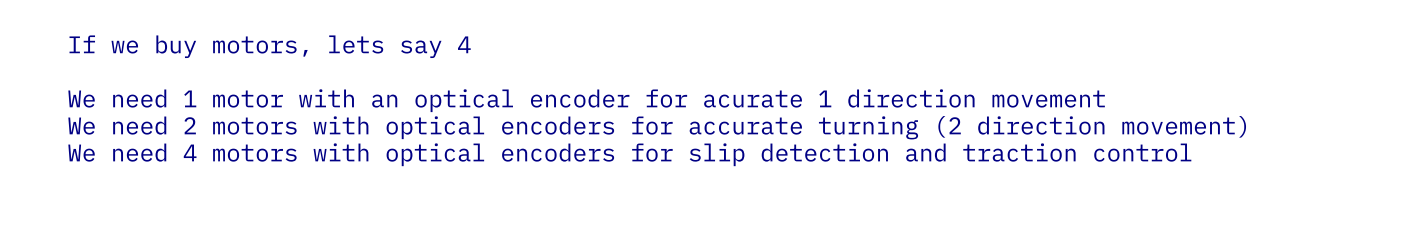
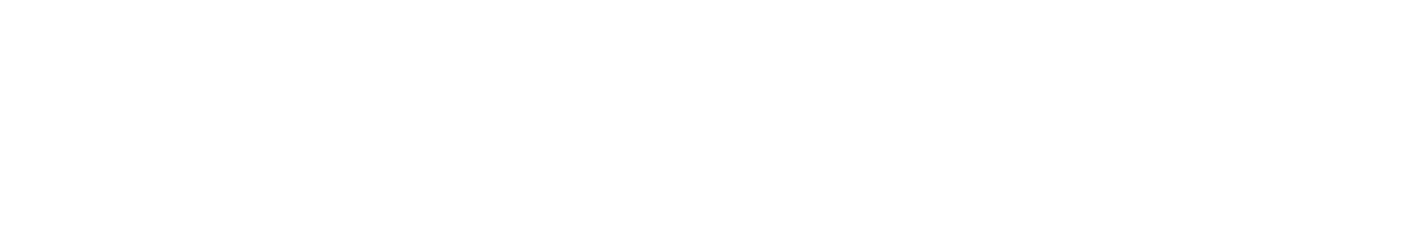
text: If we buy motors, lets say 4 (270, 46) -> none
text: We need 1 motor with an optical encoder for acurate 1 direction movement (586, 100) -> none
text: We need 2 motors with optical encoders for accurate turning (2 direction movement) (657, 127) -> none
text: We need 4 motors with optical encoders for slip detection and traction control (629, 154) -> none

